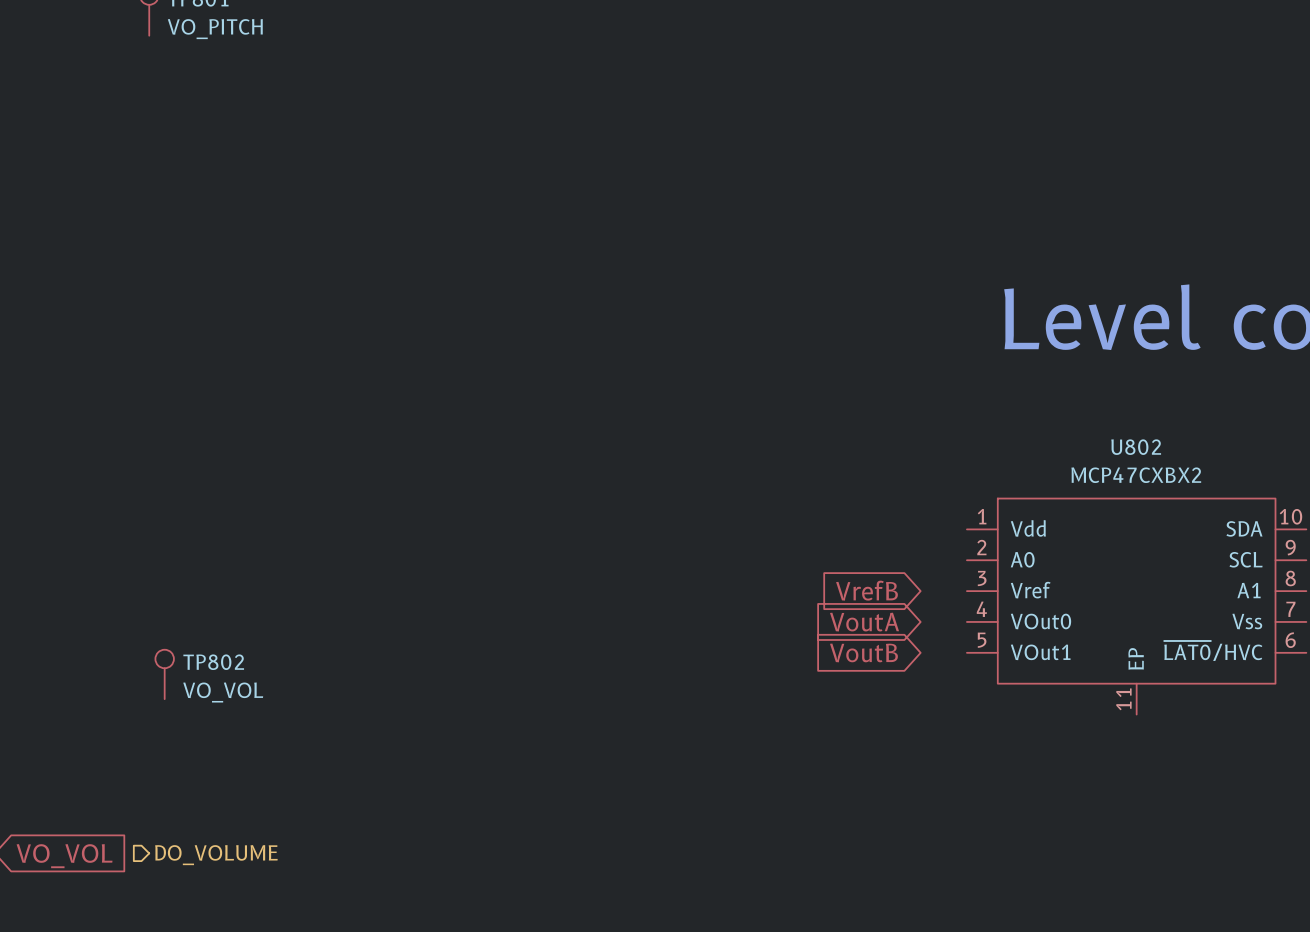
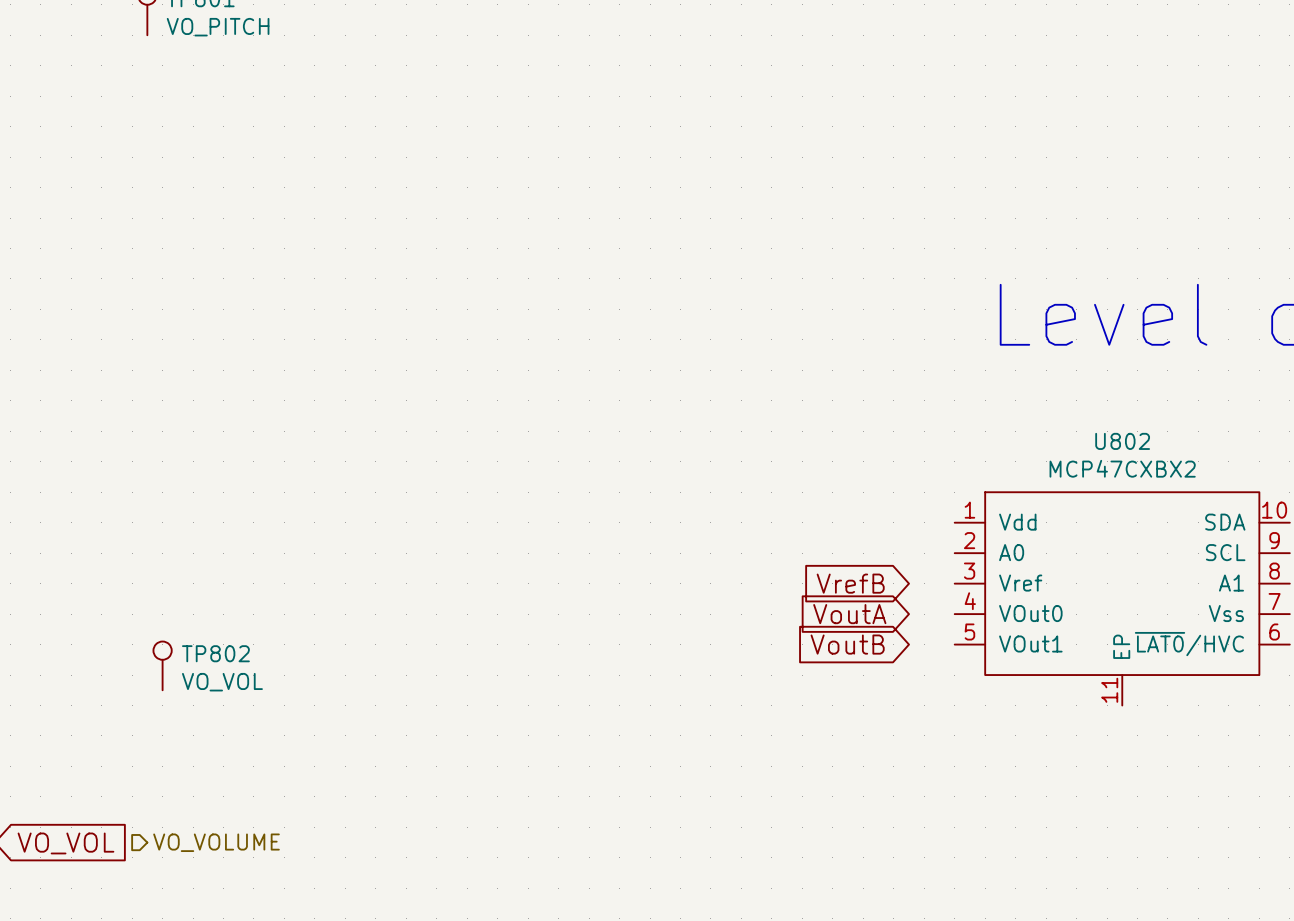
hierarchical label: DO_VOLUME (216, 855) -> VO_VOLUME (216, 842)

